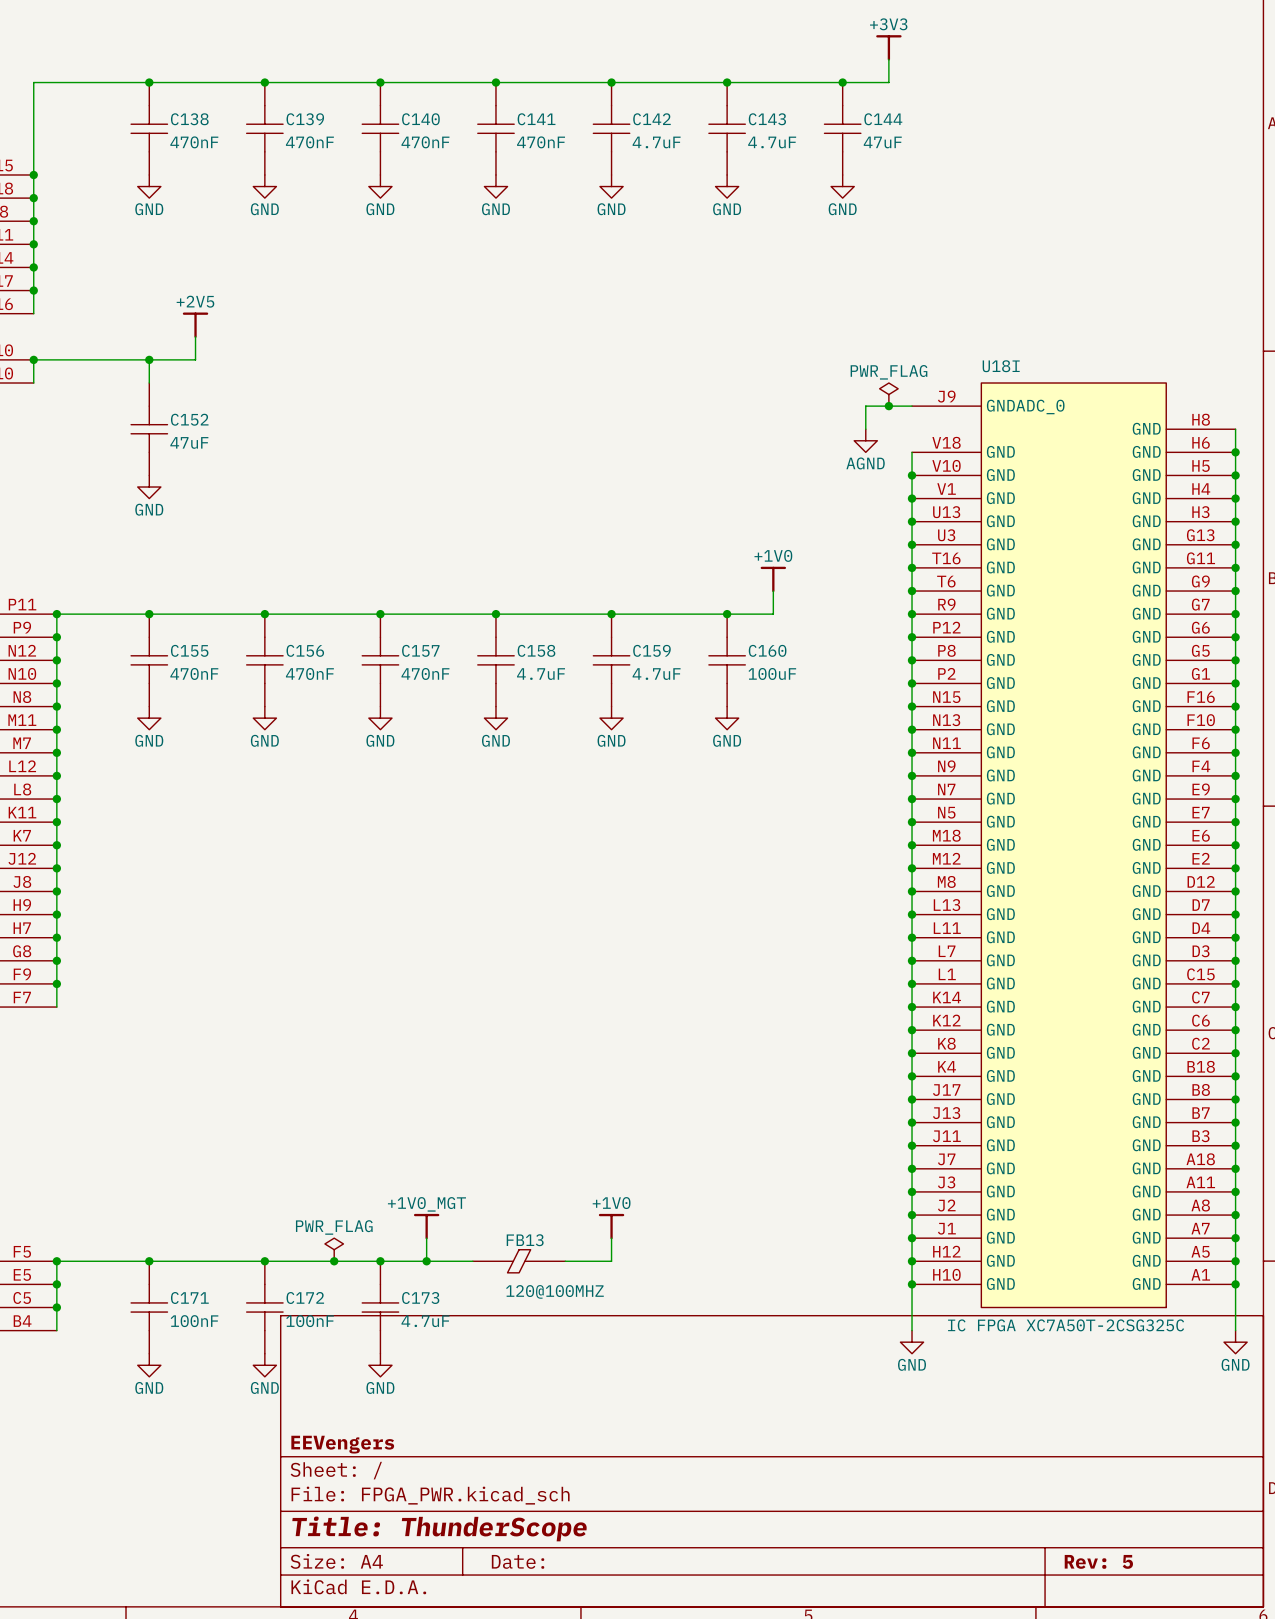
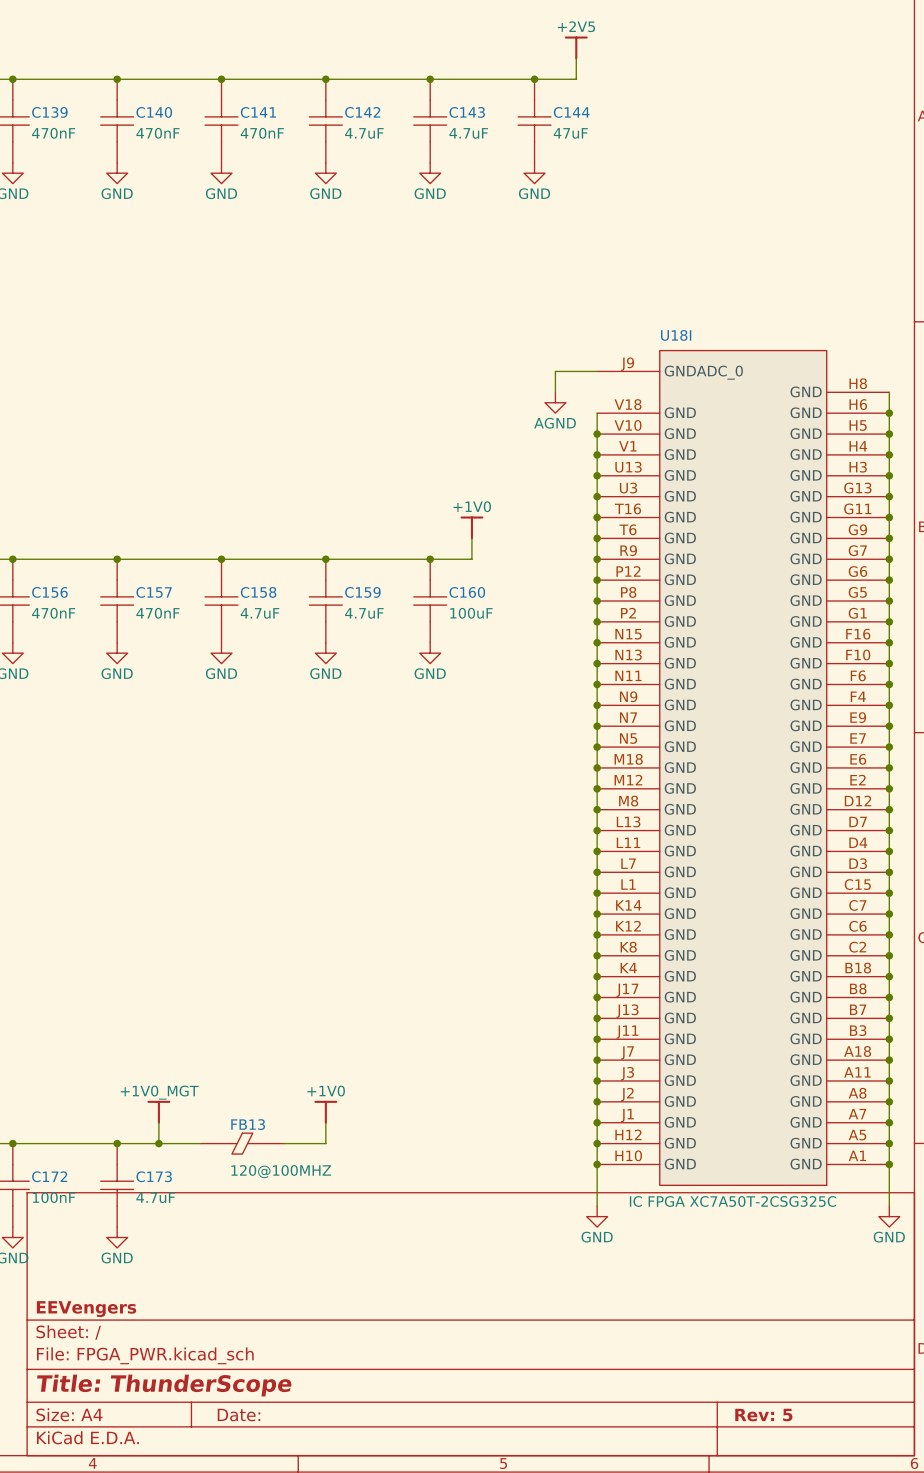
power symbol: +3V3 (888, 47) -> +2V5 (576, 47)
power symbol: PWR_FLAG (888, 394) -> none
junction: (888, 406) -> none
power symbol: PWR_FLAG (334, 1249) -> none
junction: (334, 1261) -> none

